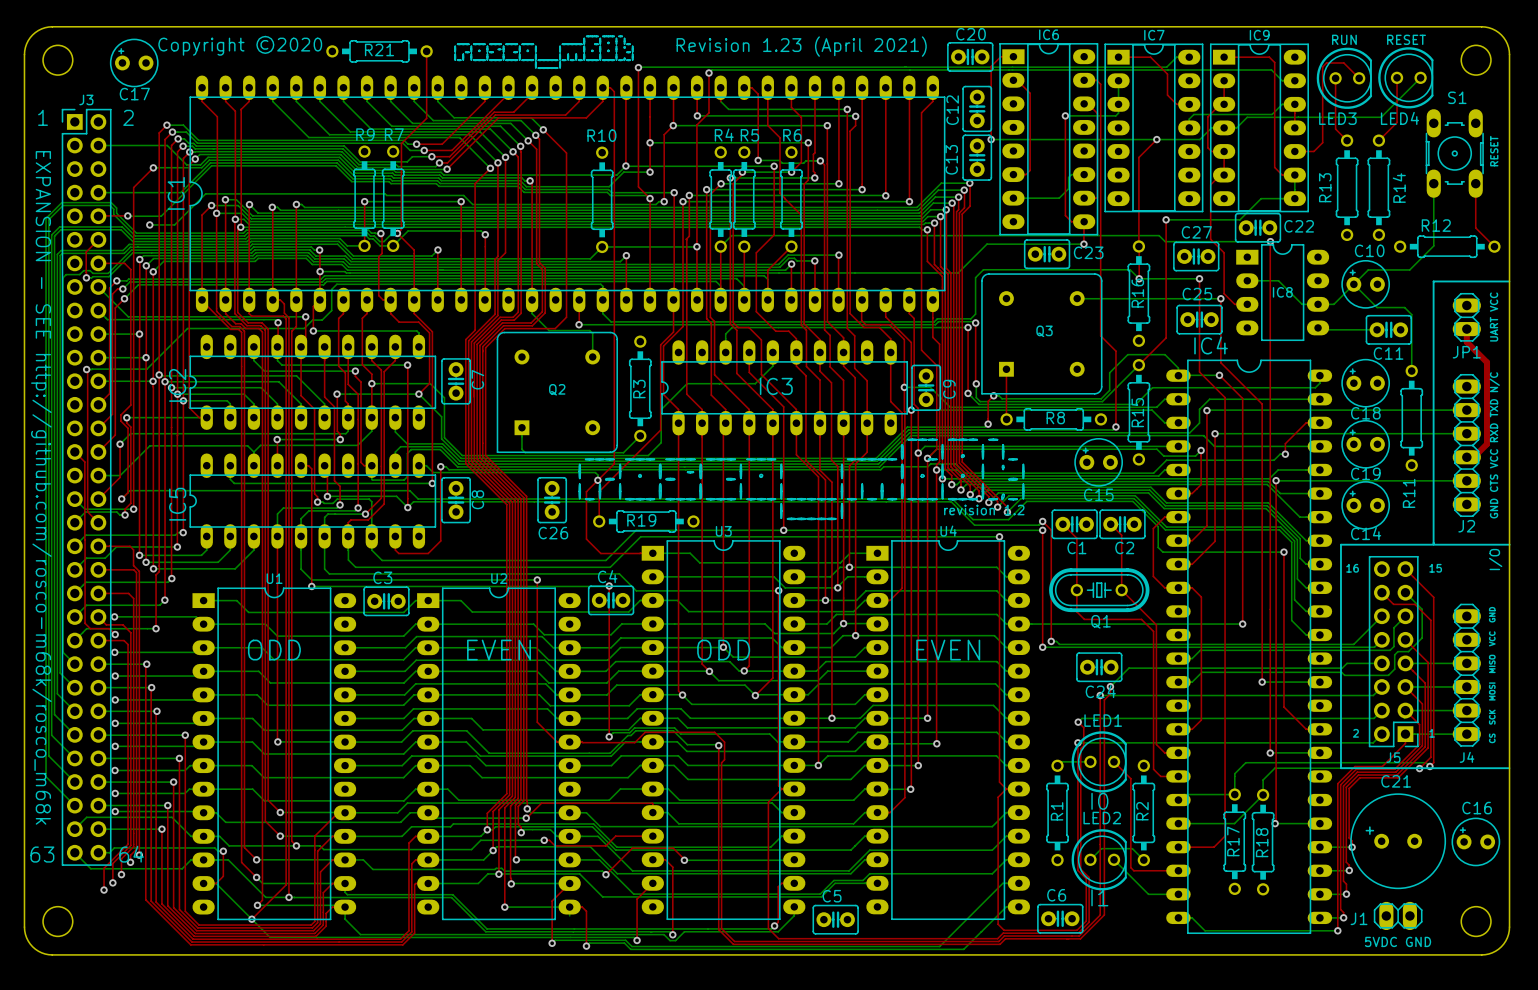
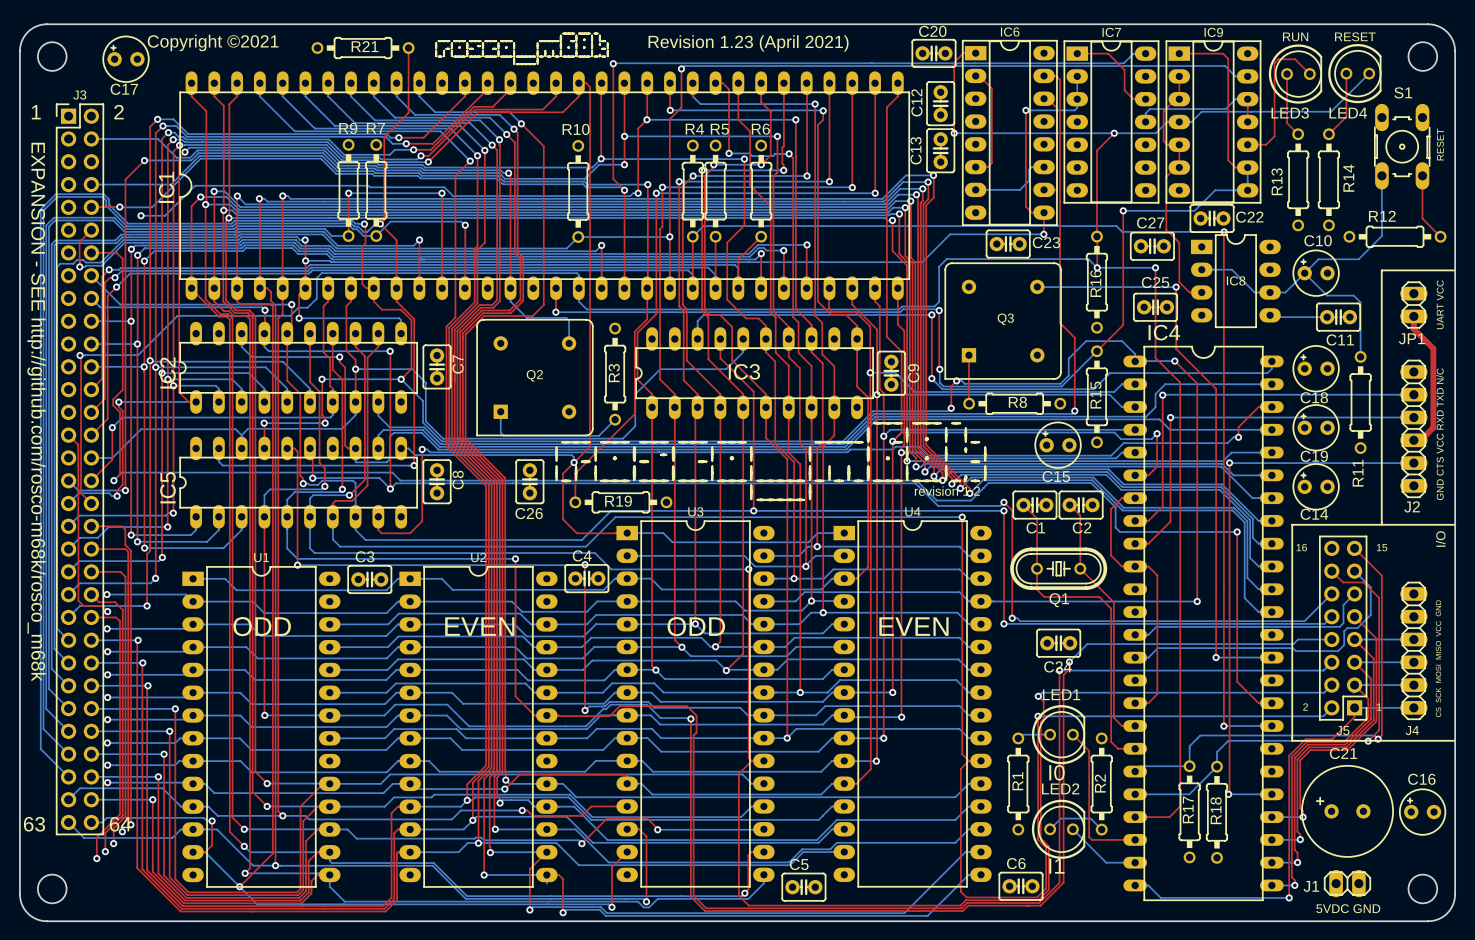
text: Copyright ©2020 (240, 45) -> Copyright ©2021 (213, 42)

